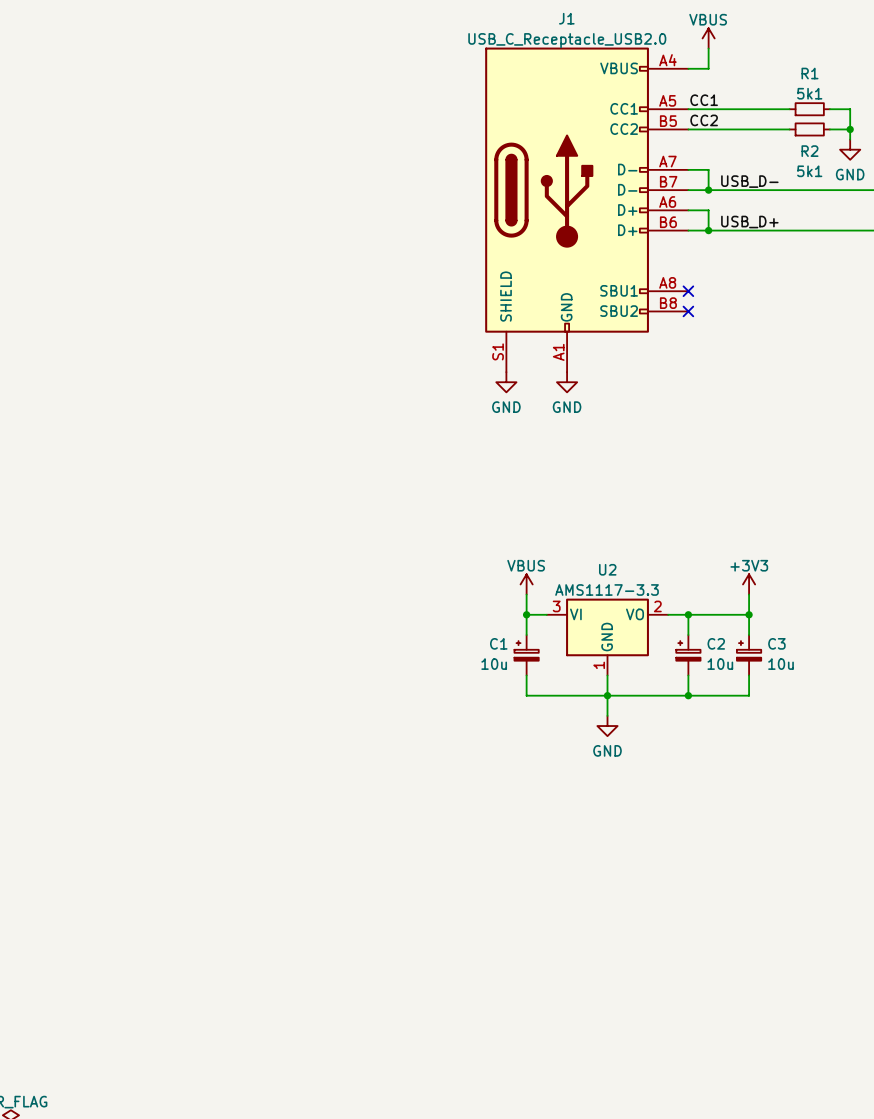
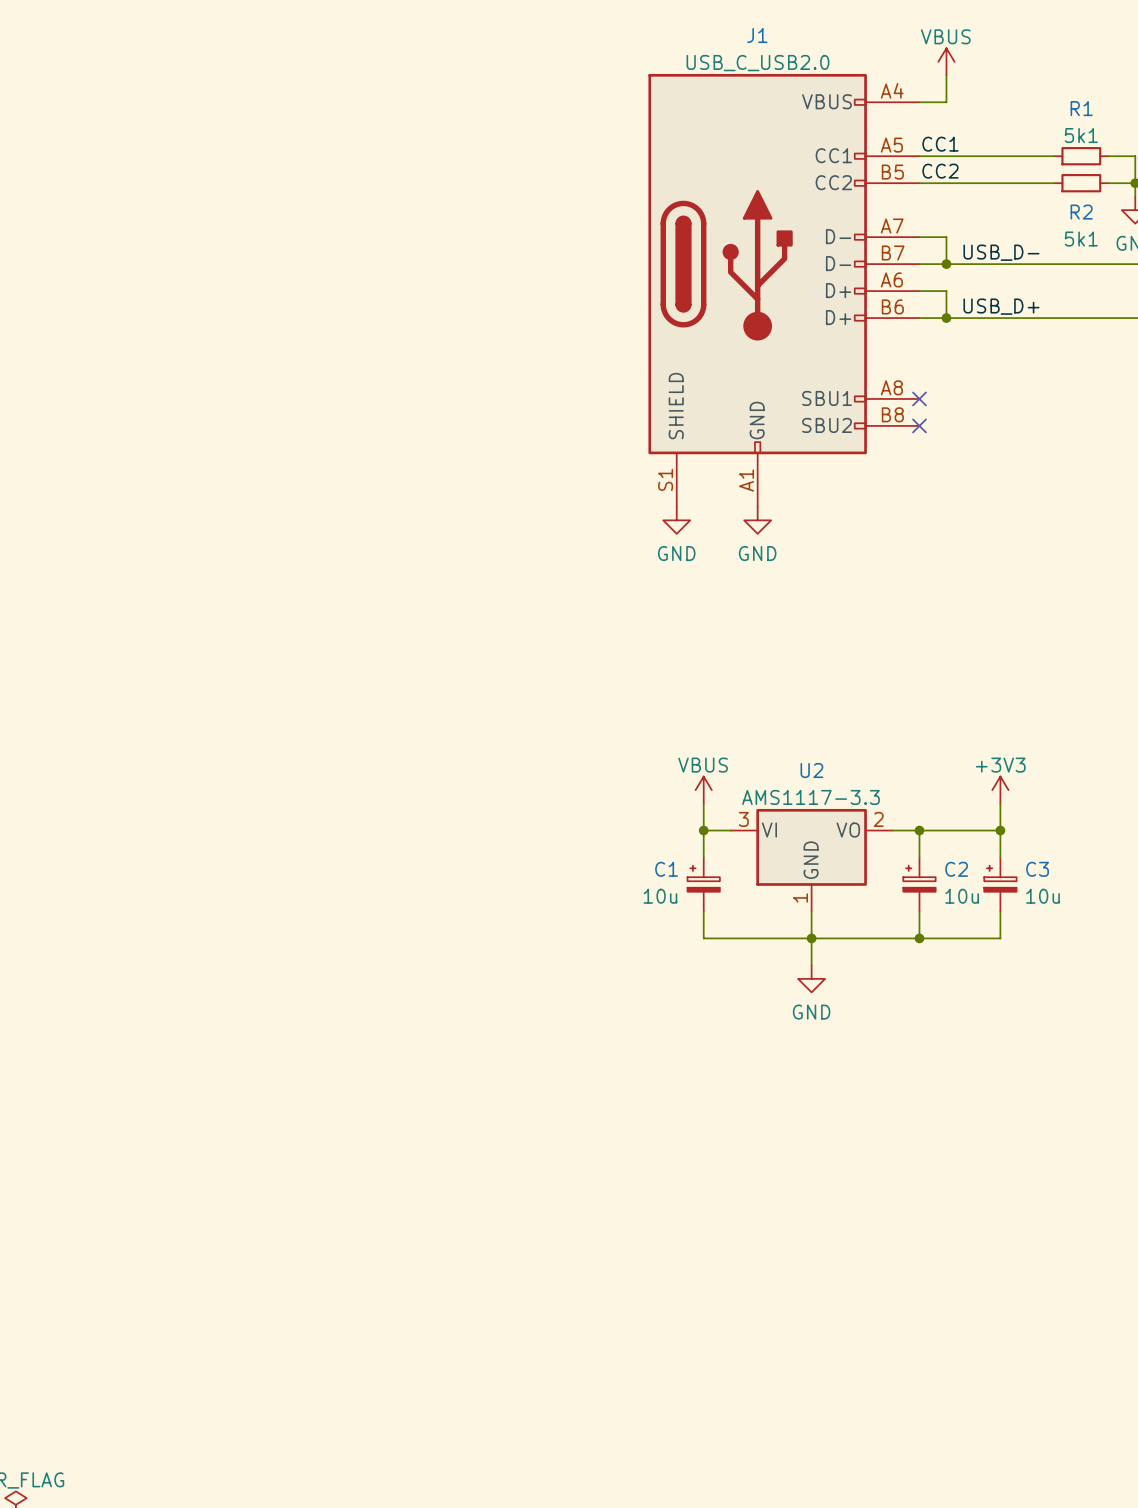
J1 value: USB_C_Receptacle_USB2.0 (567, 40) -> USB_C_USB2.0 (757, 63)

